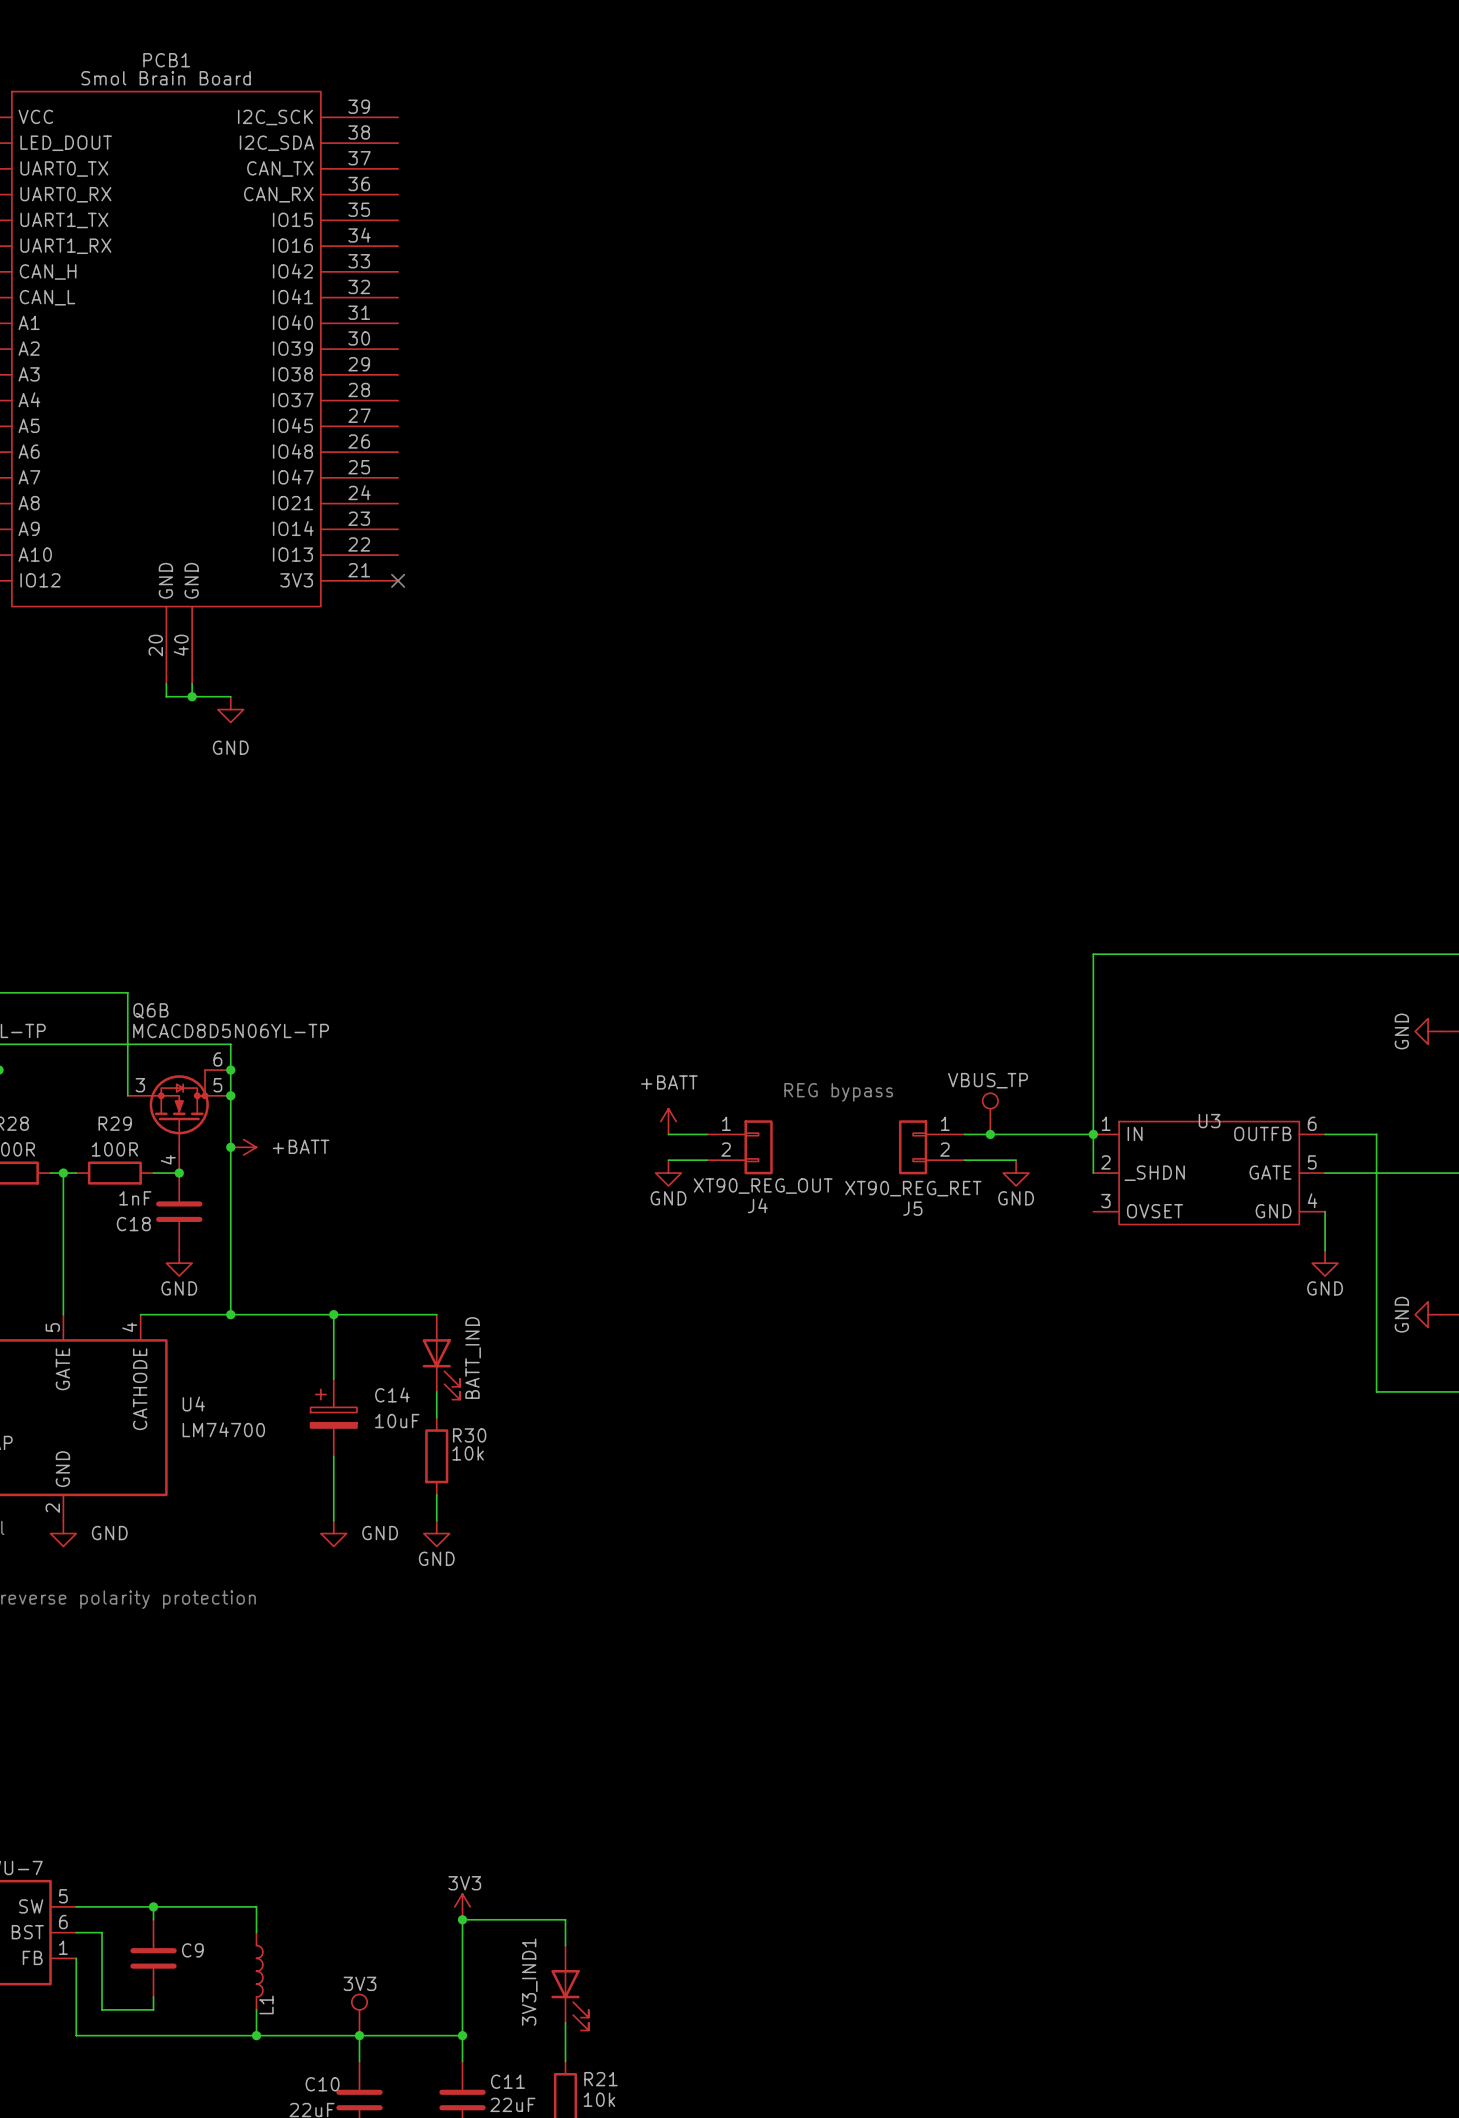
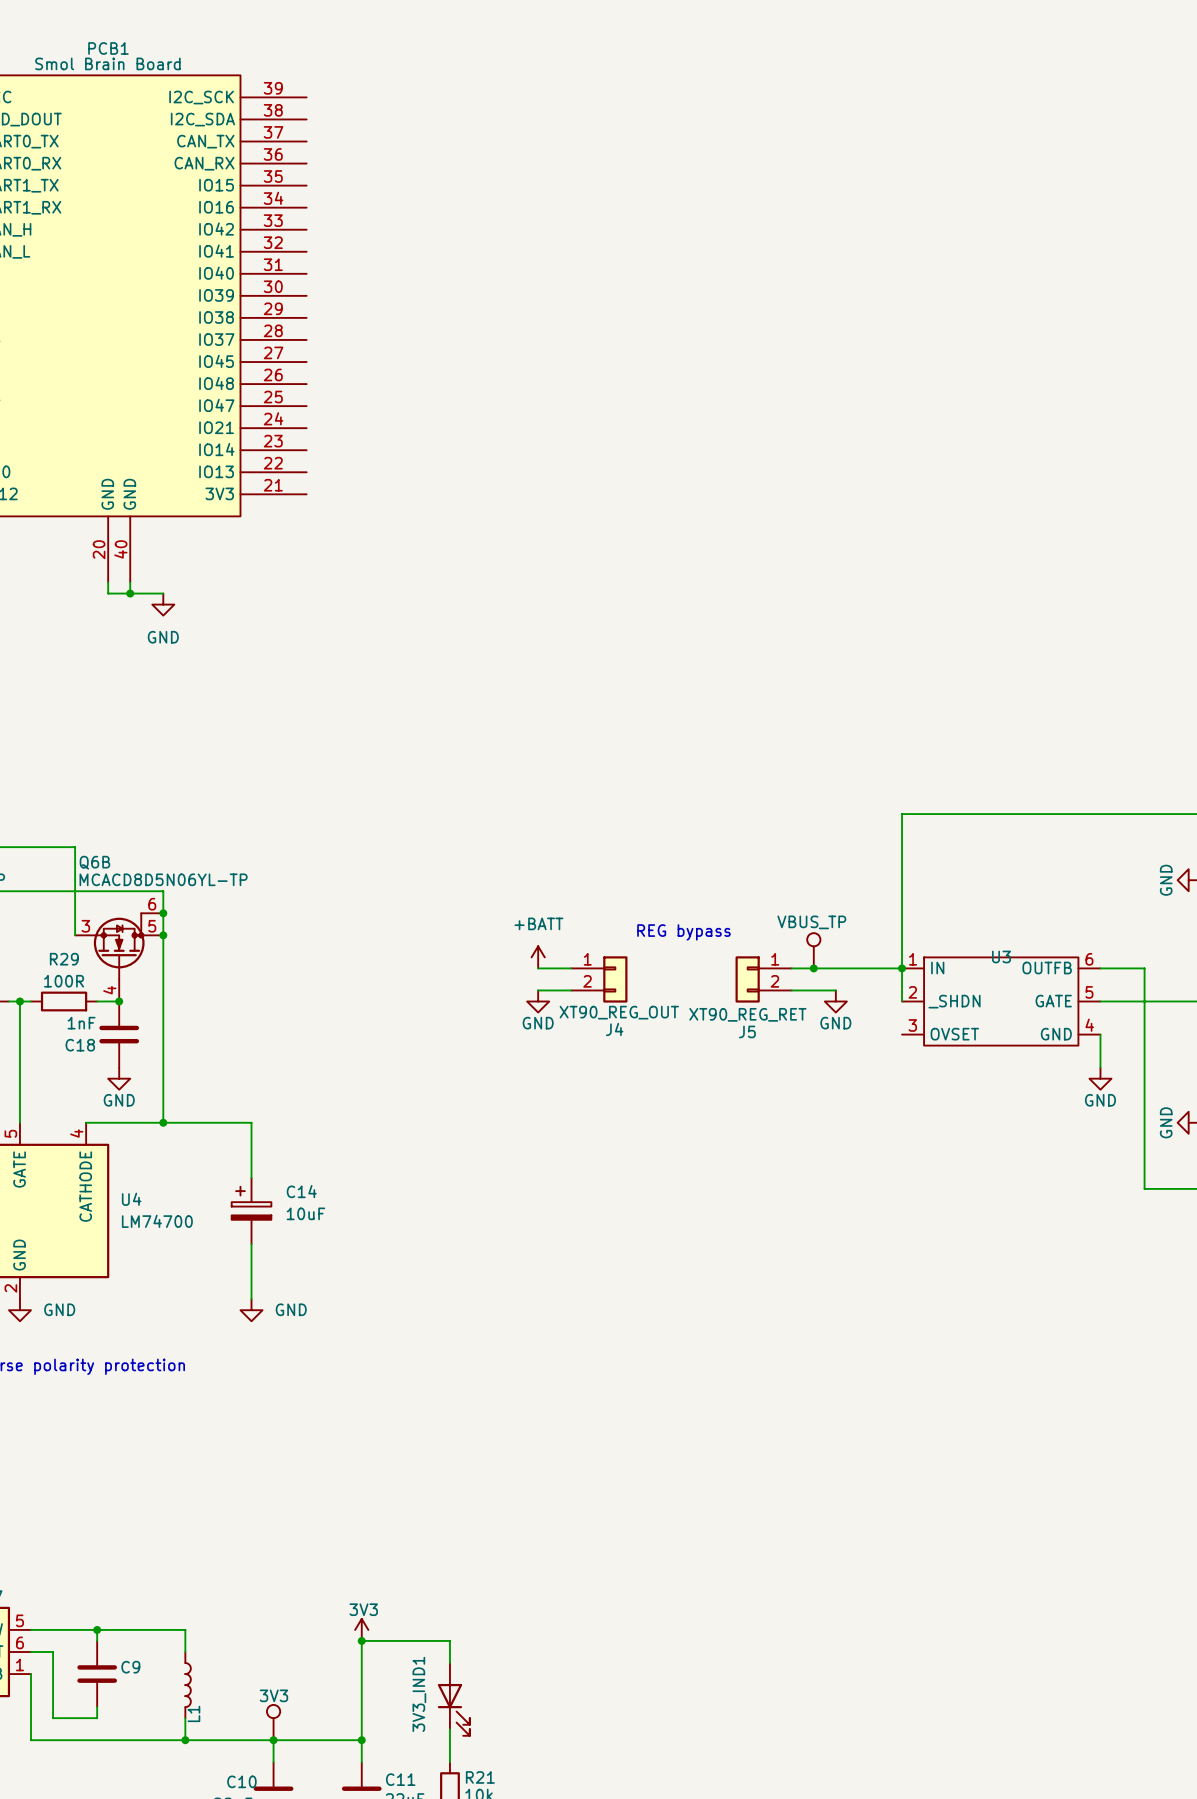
no-connect mark: (398, 580) -> none
junction: (230, 1147) -> none
power symbol: +BATT (243, 1147) -> none
wire: (333, 1314) (436, 1314) -> none
junction: (333, 1314) -> none
BATT_IND: (441, 1357) -> none
wire: (436, 1391) (436, 1417) -> none
R30: 10k (436, 1456) -> none
wire: (436, 1494) (436, 1520) -> none
power symbol: GND (436, 1533) -> none

